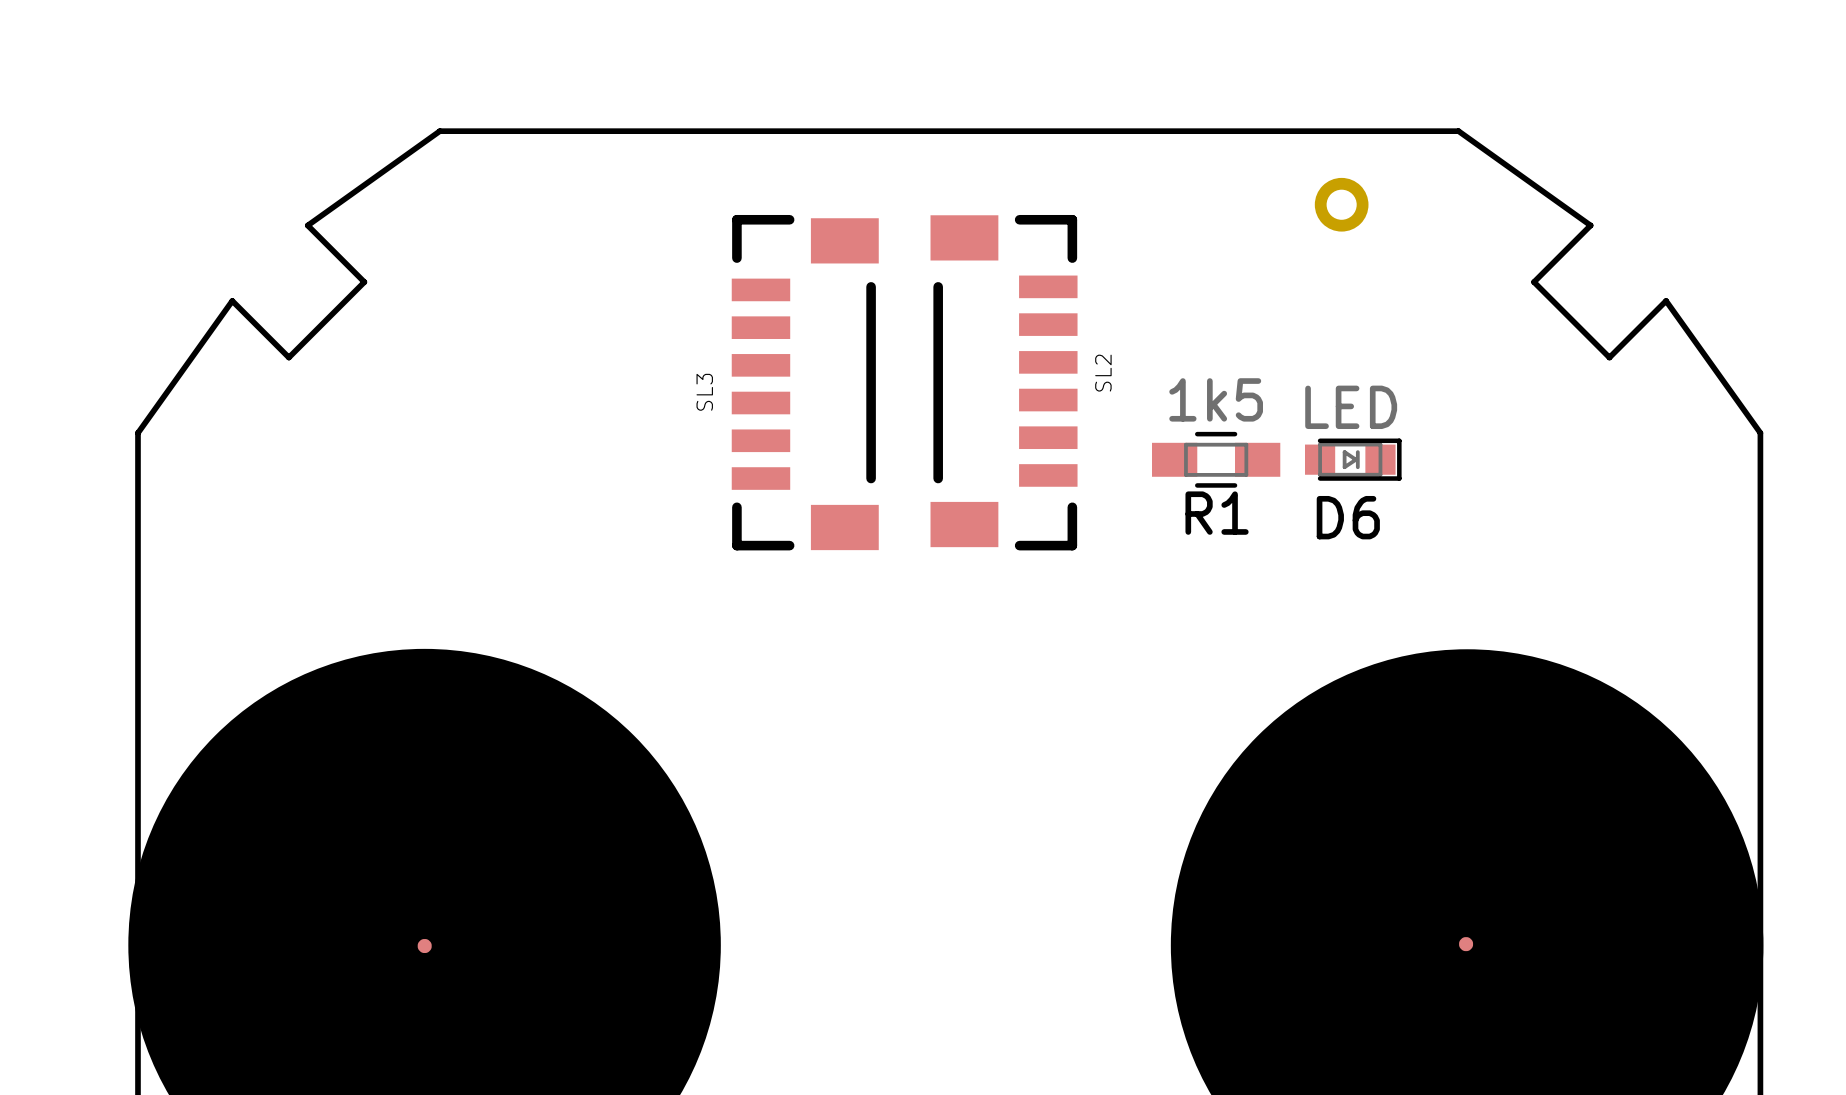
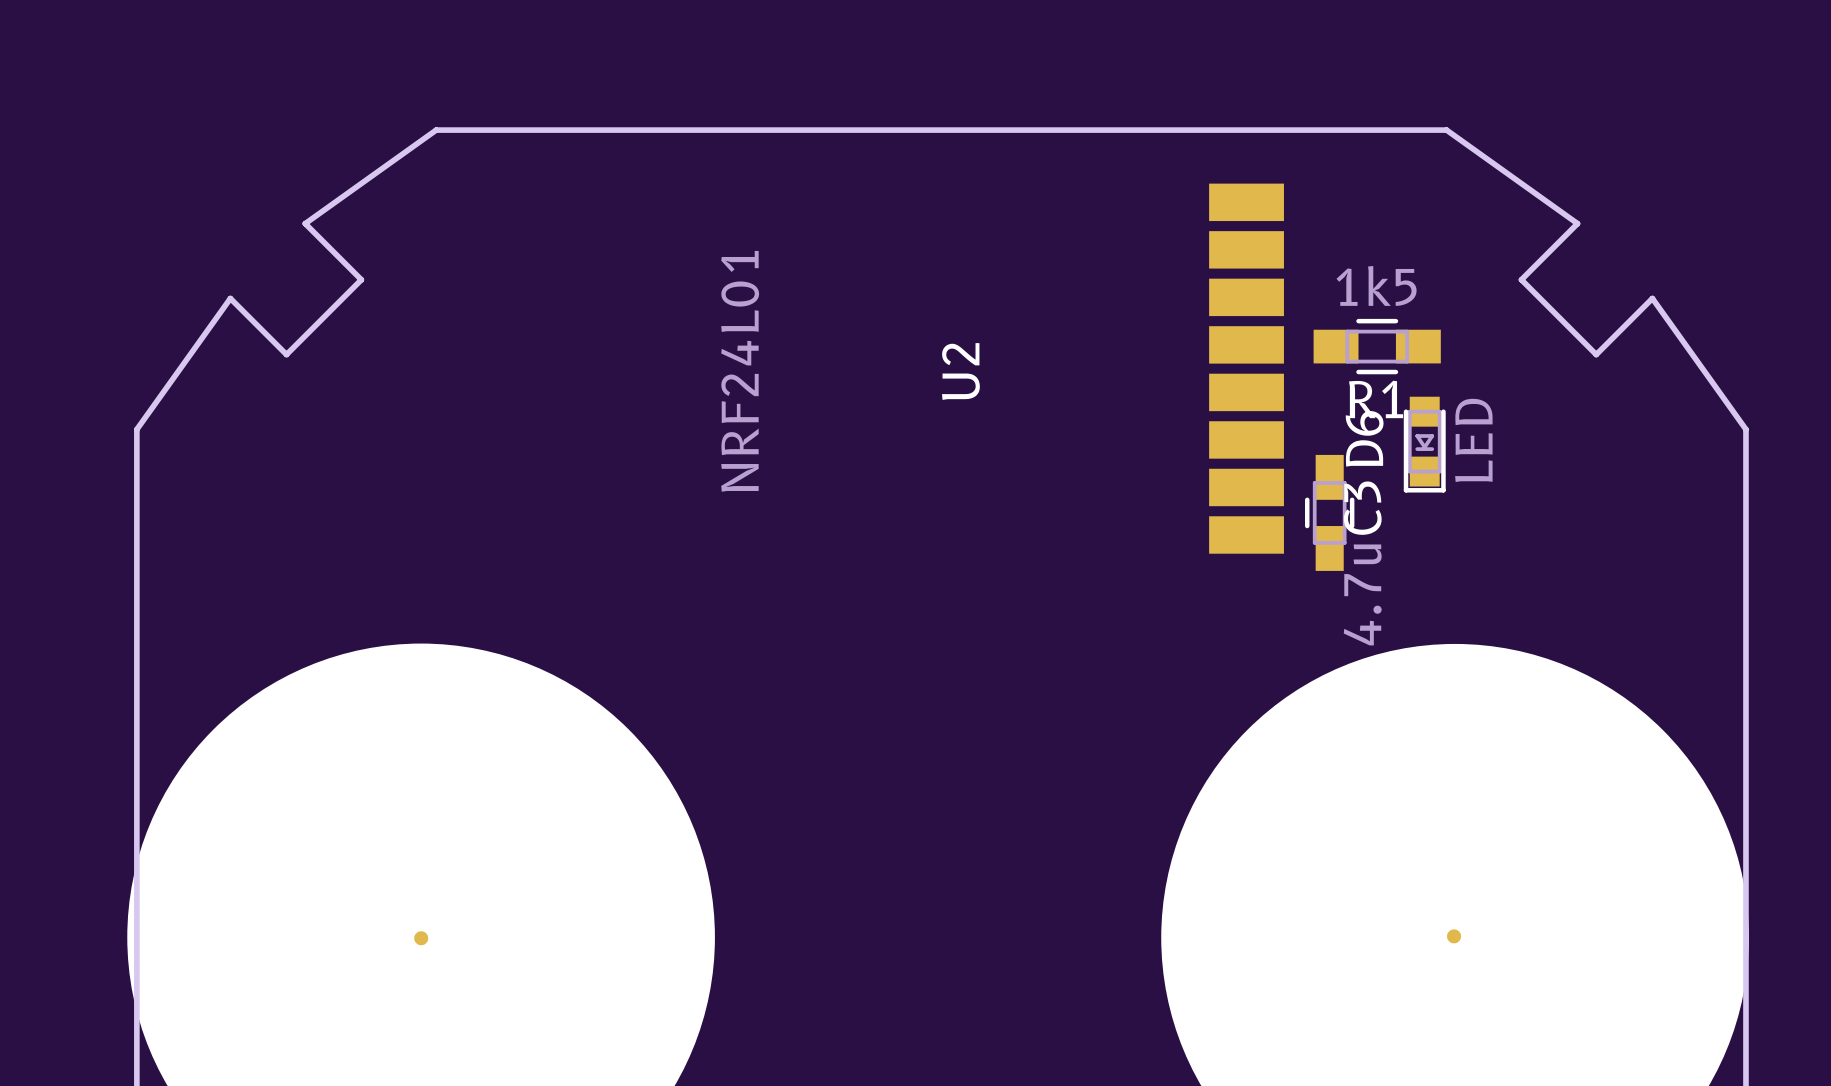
part: (1341, 204) -> none
U2: none -> NRF24L01 (1246, 368)
SL3: (805, 382) -> none
SL2: (1004, 382) -> none
R1 position: (1216, 459) -> (1377, 346)
D6 rotation: 0° (1353, 459) -> 90° clockwise (1424, 444)
D6 position: (1353, 459) -> (1424, 444)
C3: none -> 4.7u (1329, 512)

